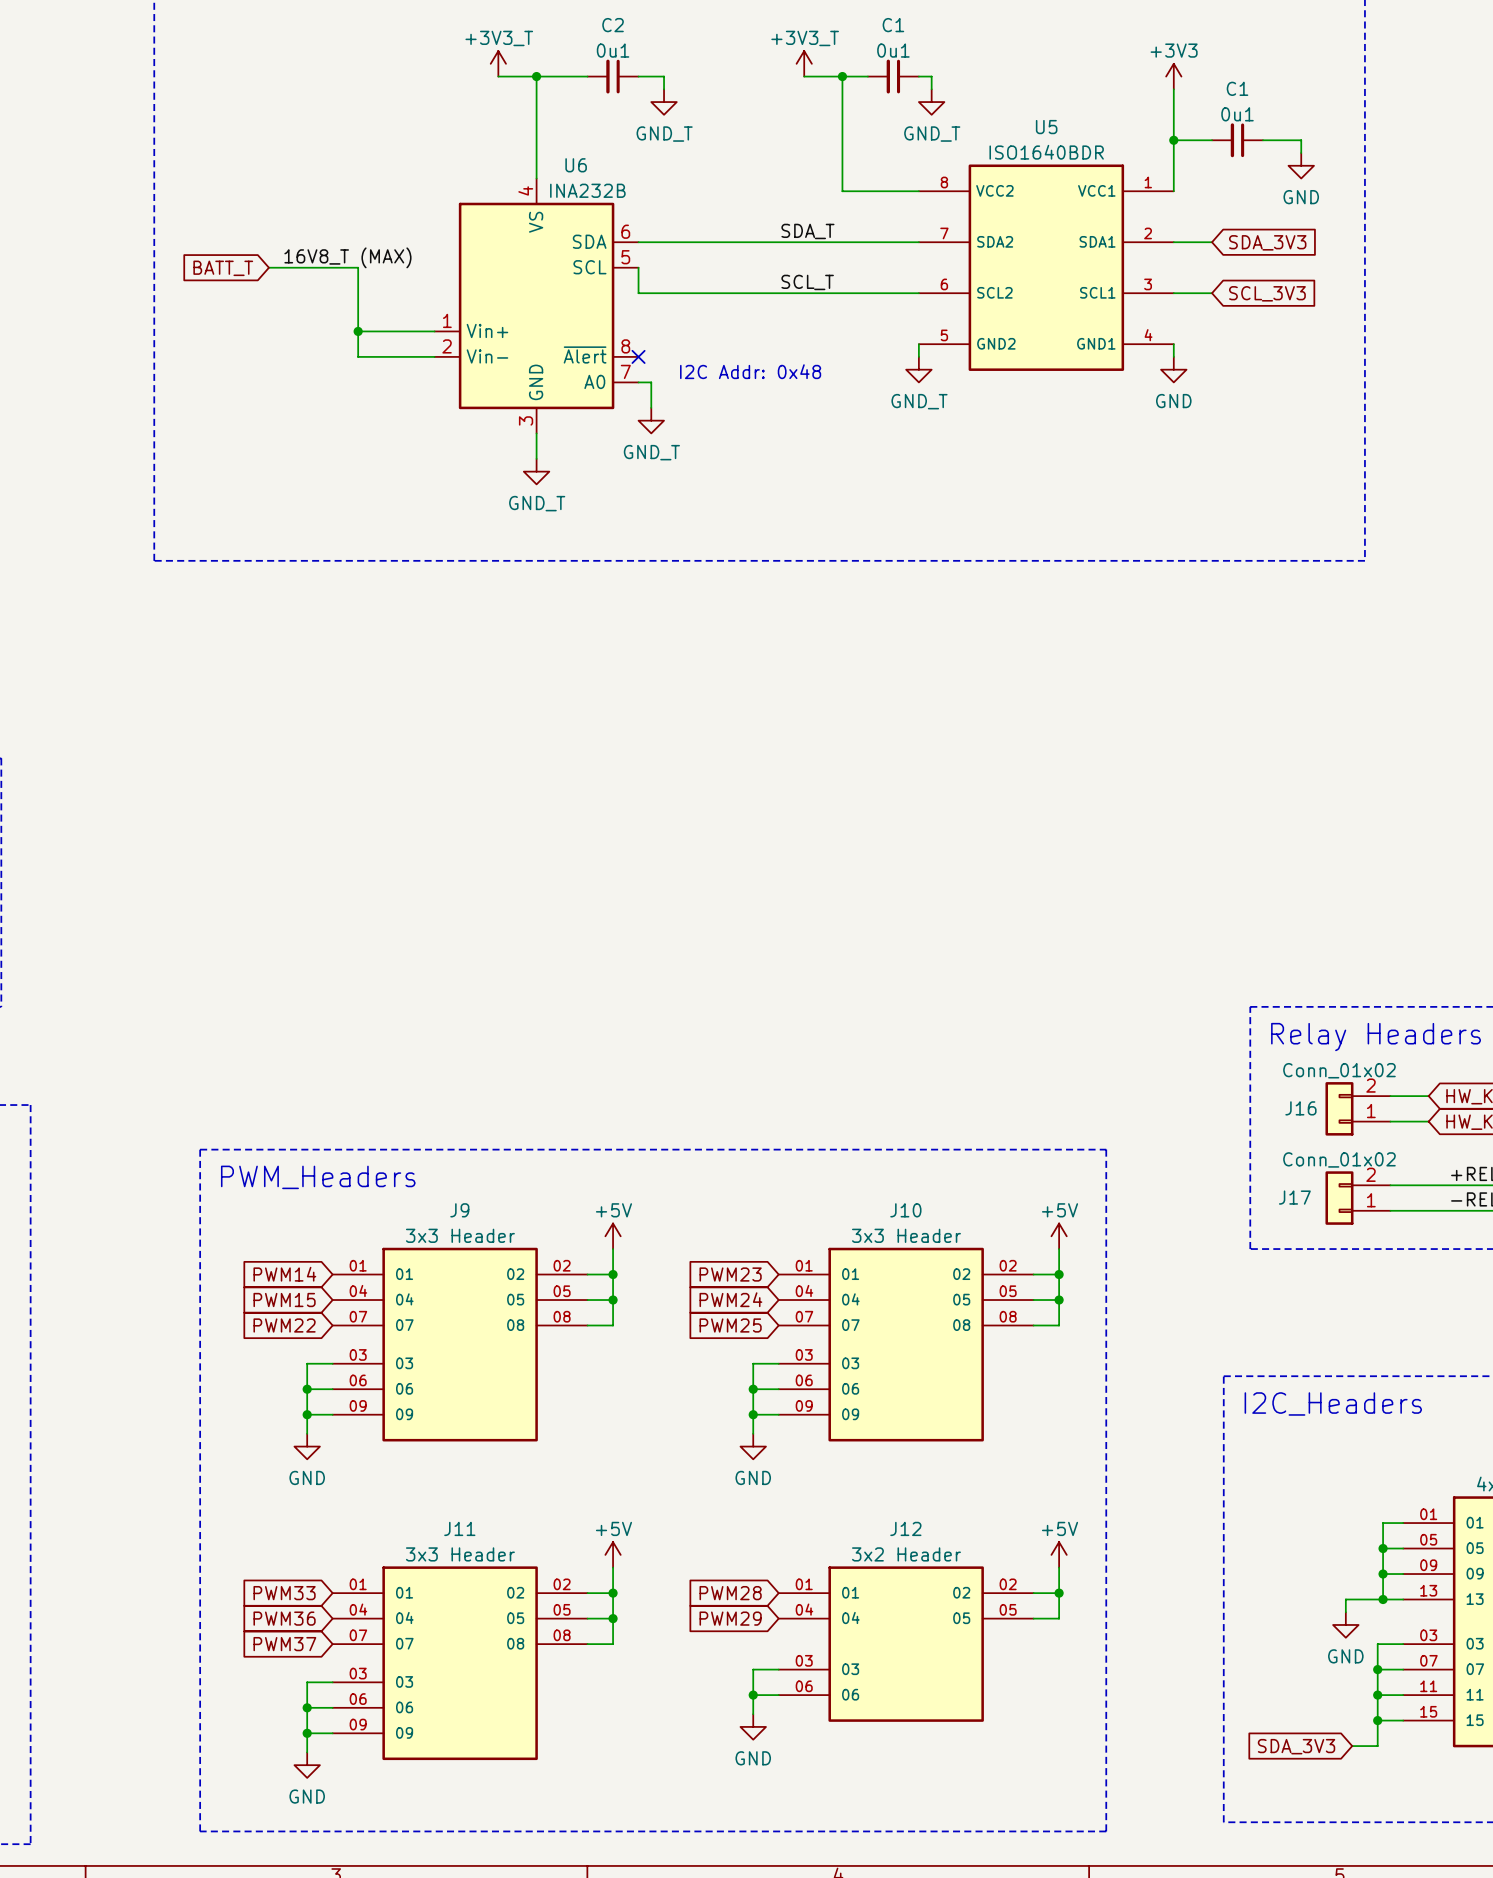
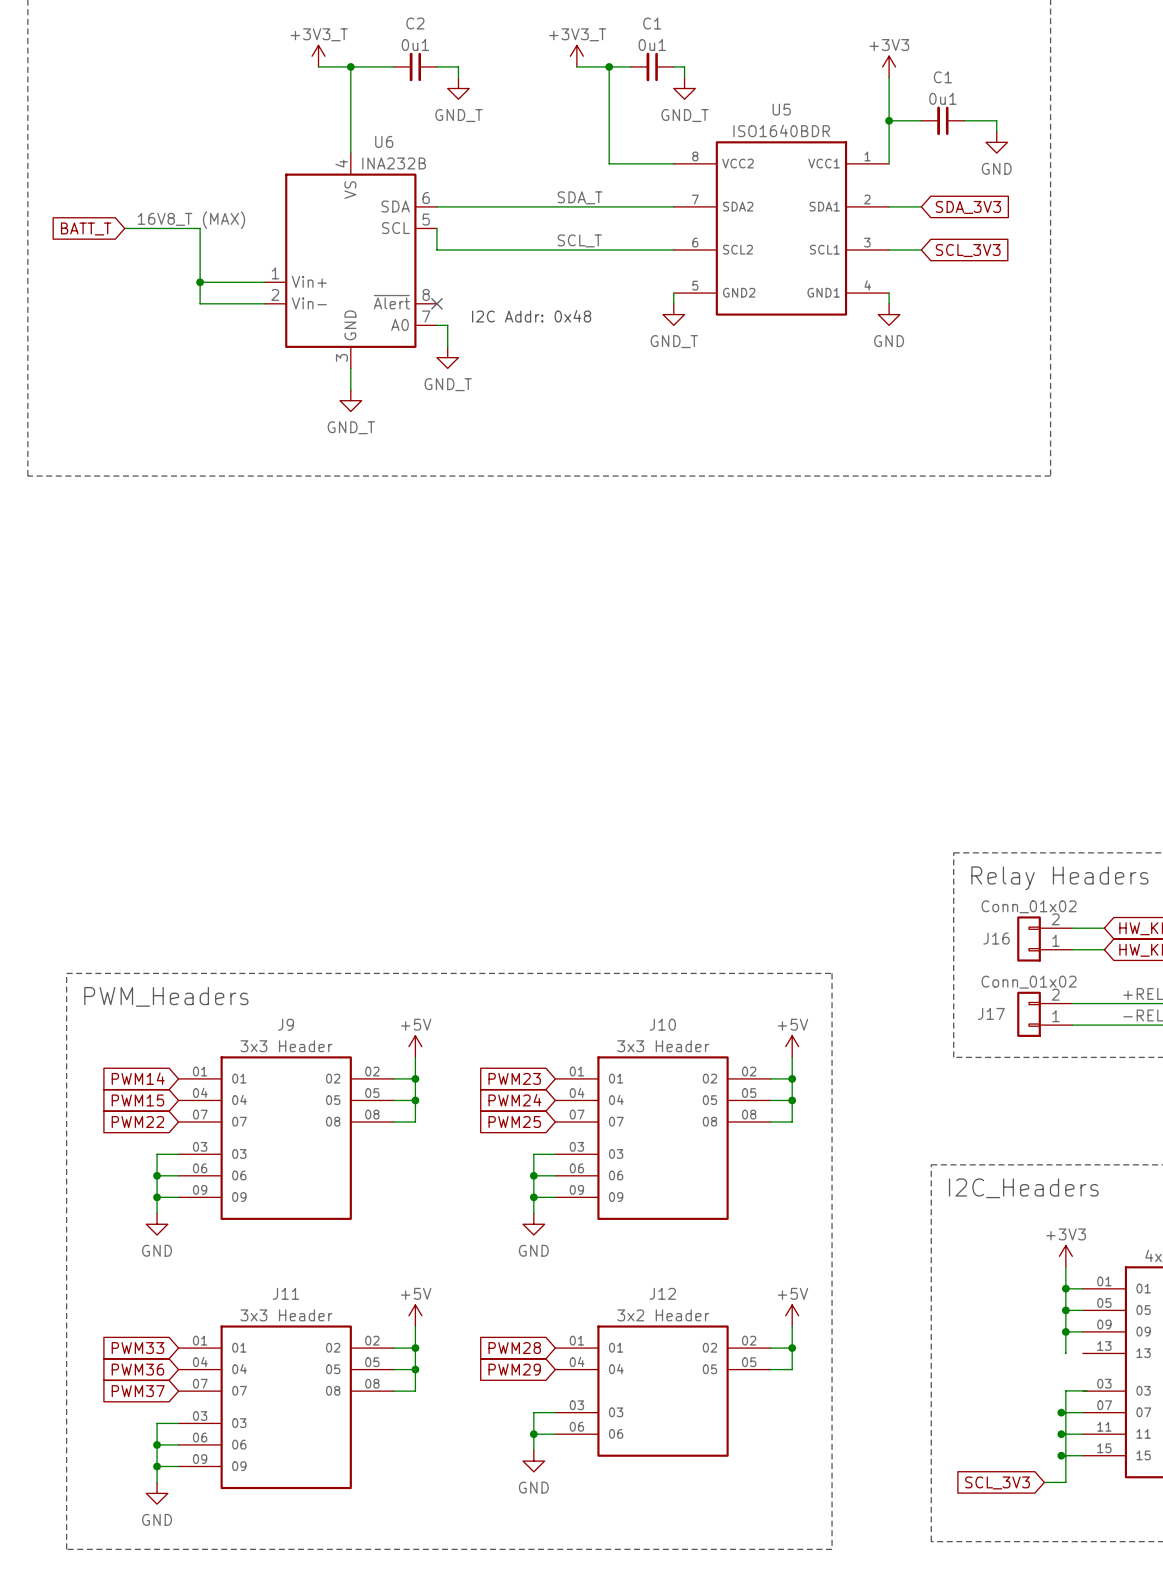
power symbol: none -> +3V3 (1065, 1256)
wire: none -> (1065, 1267) (1065, 1288)
junction: none -> (1065, 1288)
junction: (1383, 1599) -> none
wire: (1403, 1599) (1345, 1599) (1345, 1612) -> none
power symbol: GND (1345, 1624) -> none
wire: none -> (1087, 1390) (1065, 1390) (1065, 1482) (1044, 1482)
wire: (1403, 1644) (1377, 1644) (1377, 1746) (1352, 1746) -> none
global label: SDA_3V3 (1296, 1746) -> SCL_3V3 (997, 1482)

